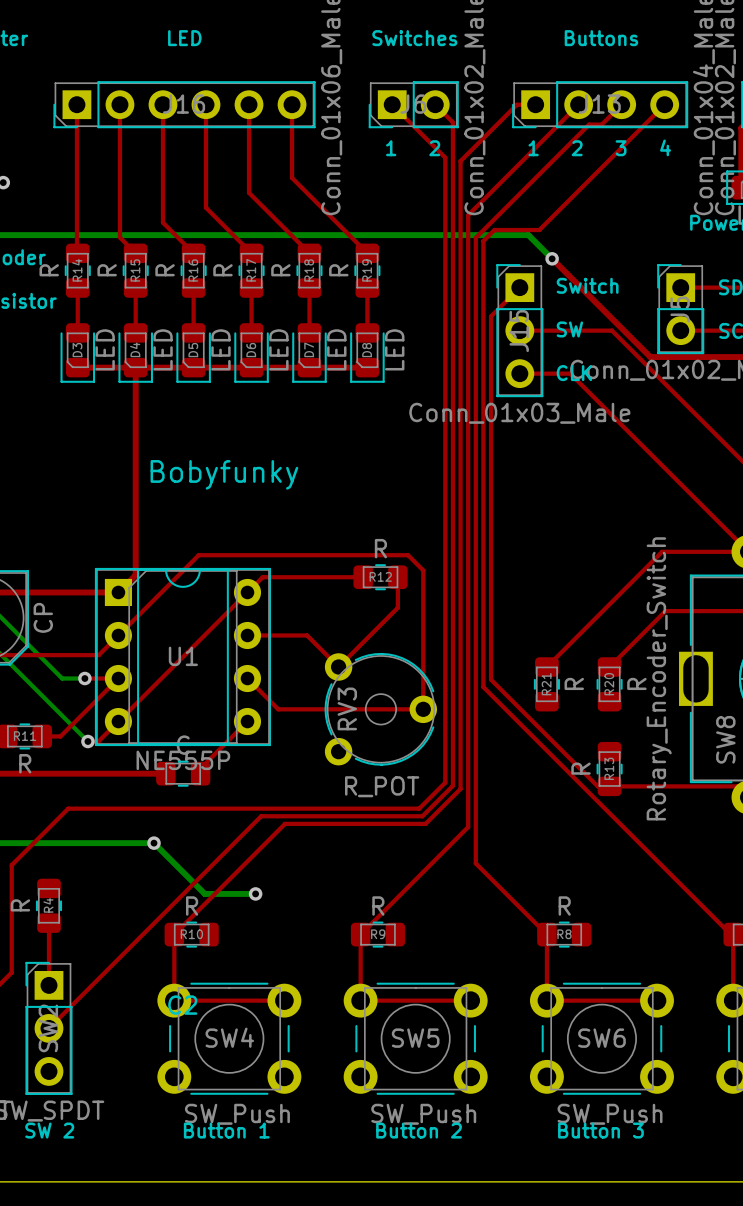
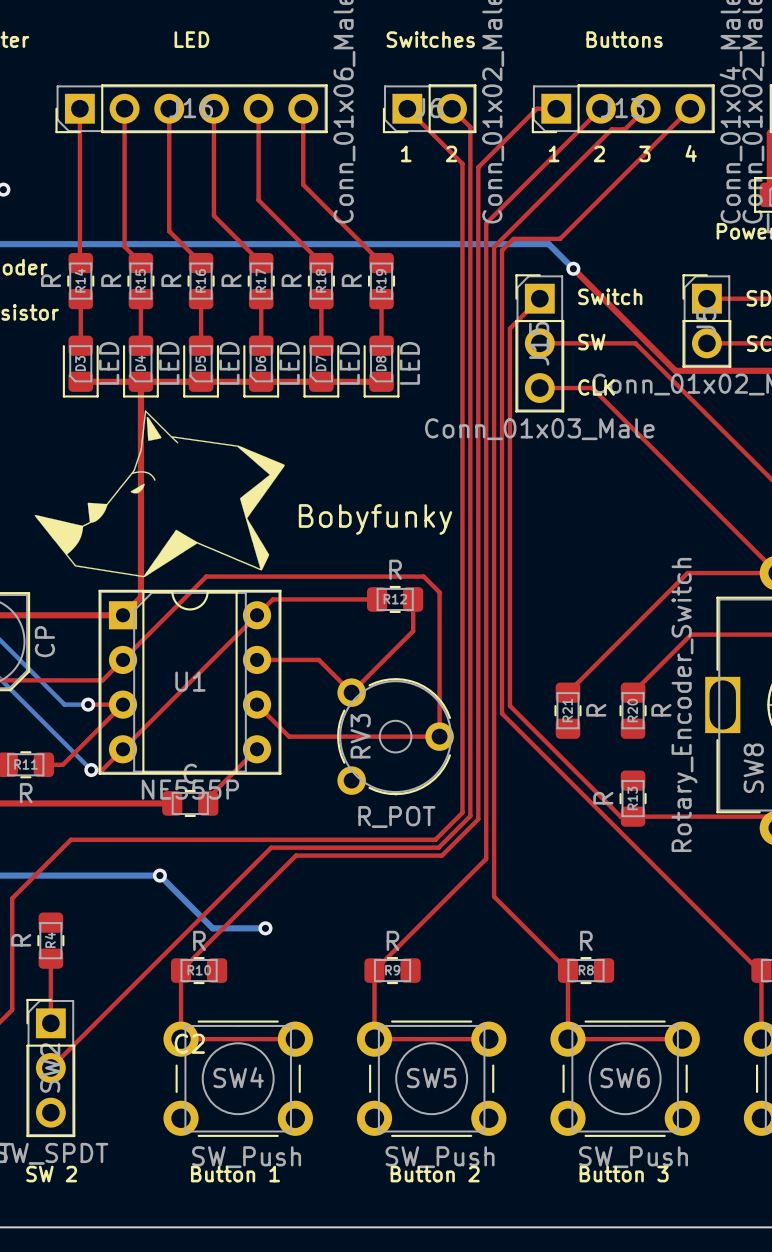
drawing: none -> [34, 410, 285, 578]
text position: Bobyfunky (224, 474) -> Bobyfunky (375, 519)

